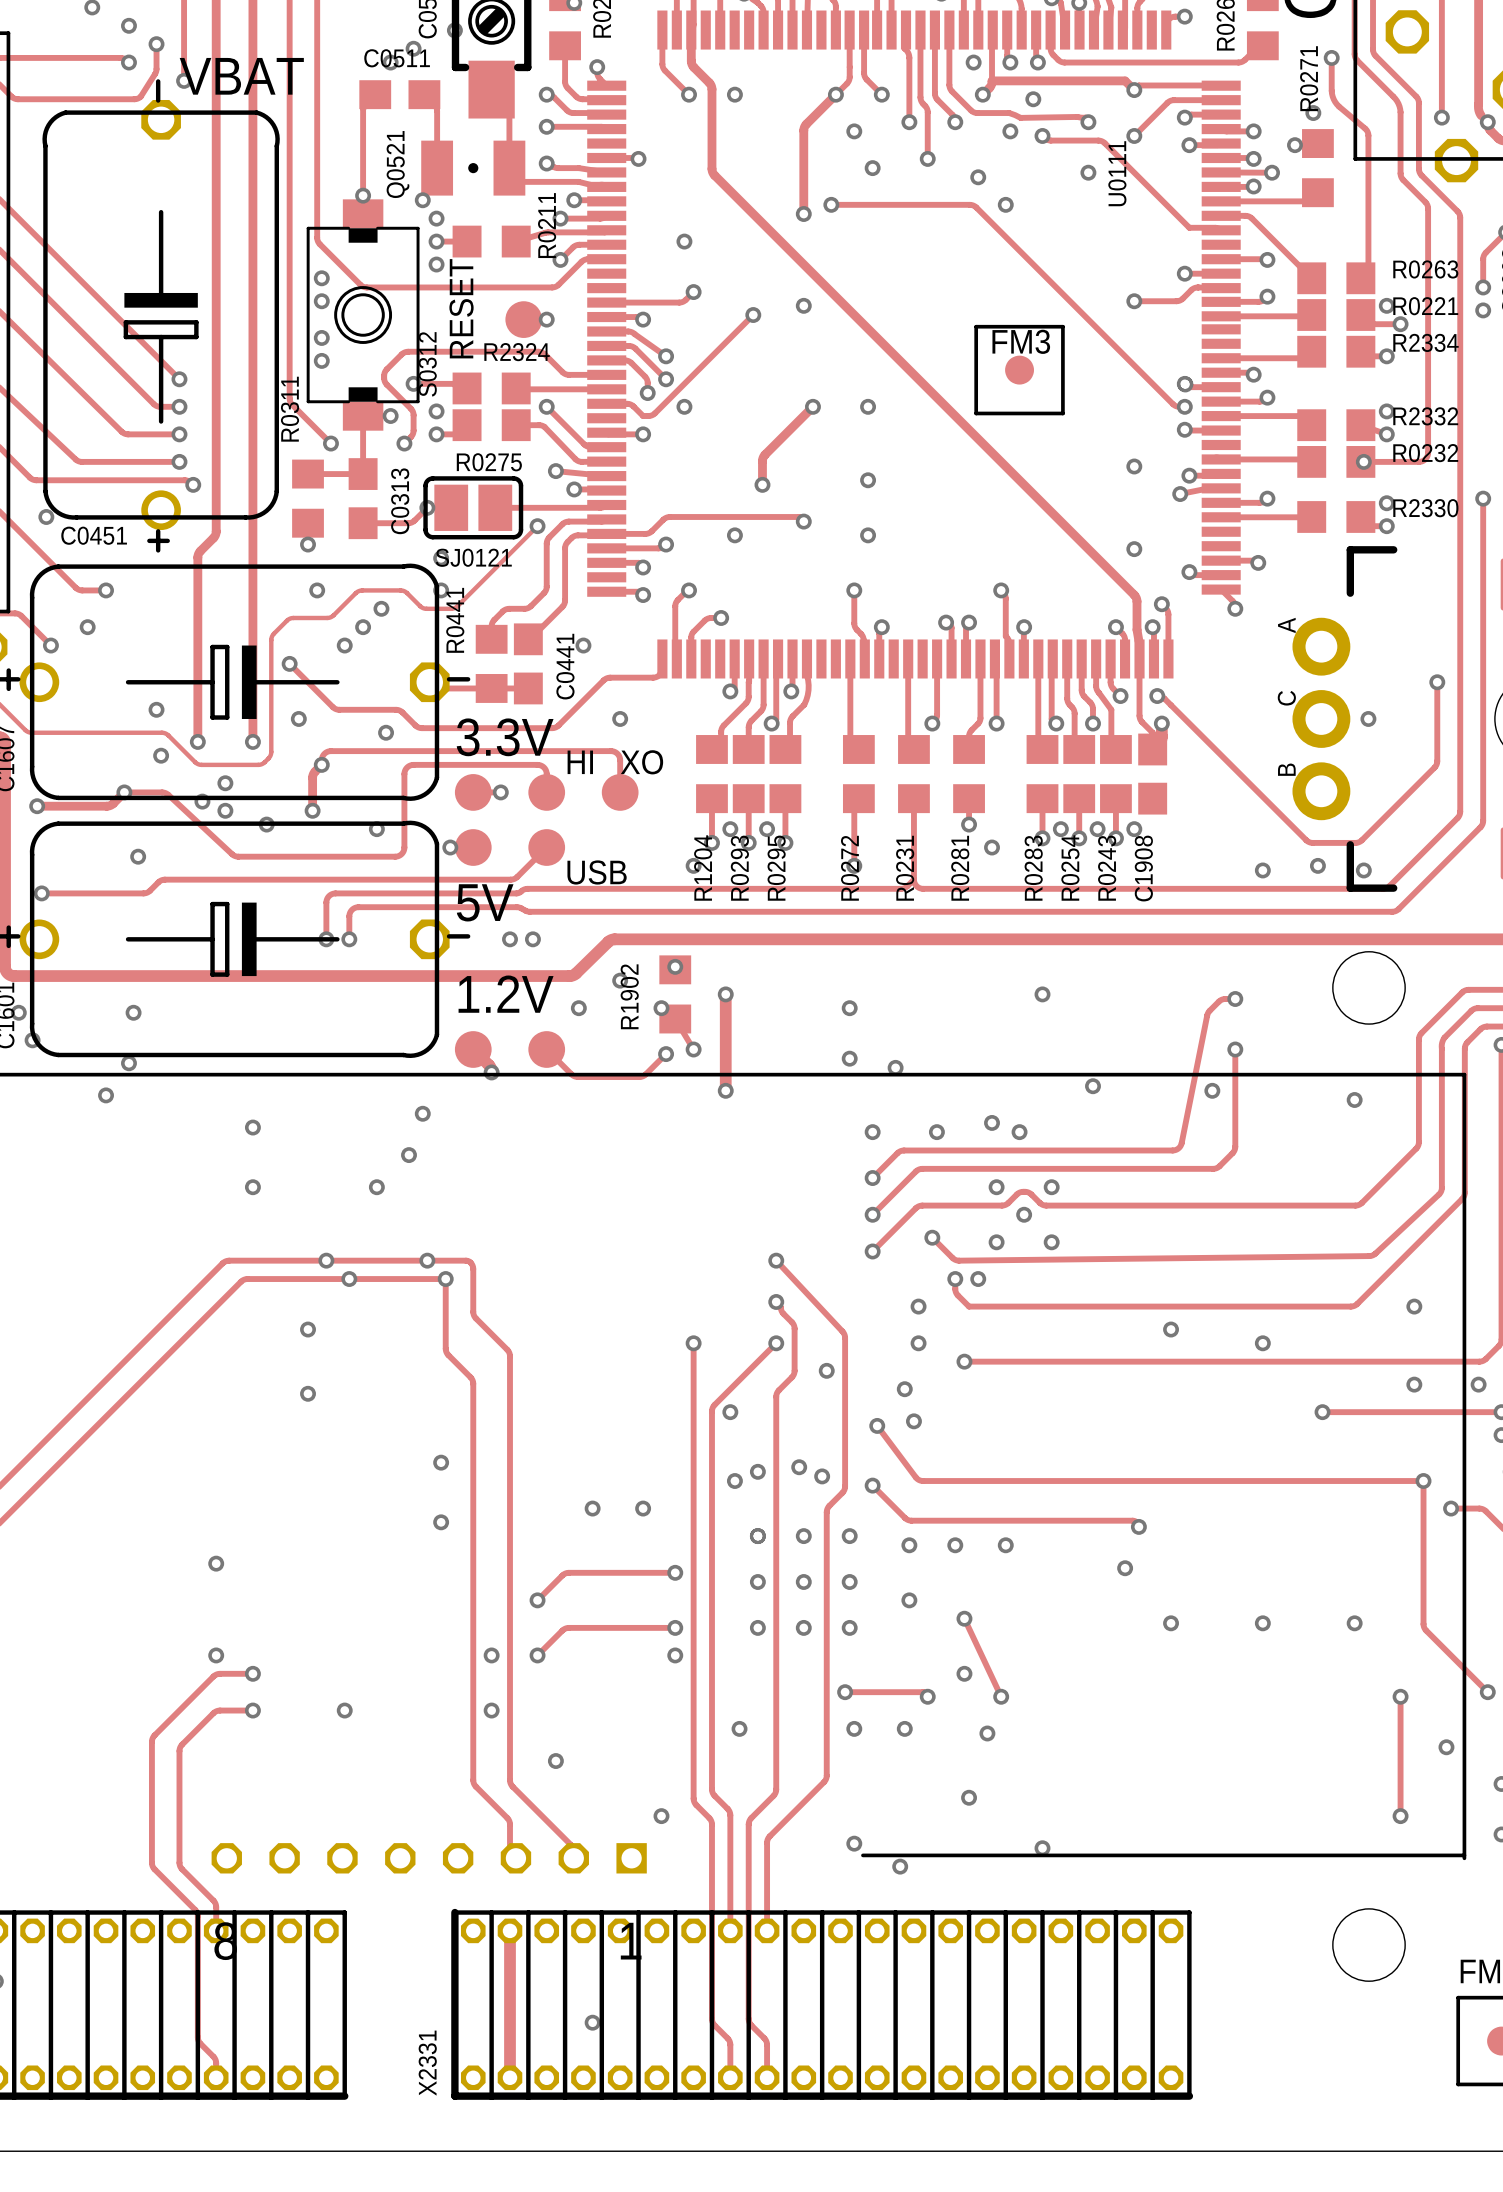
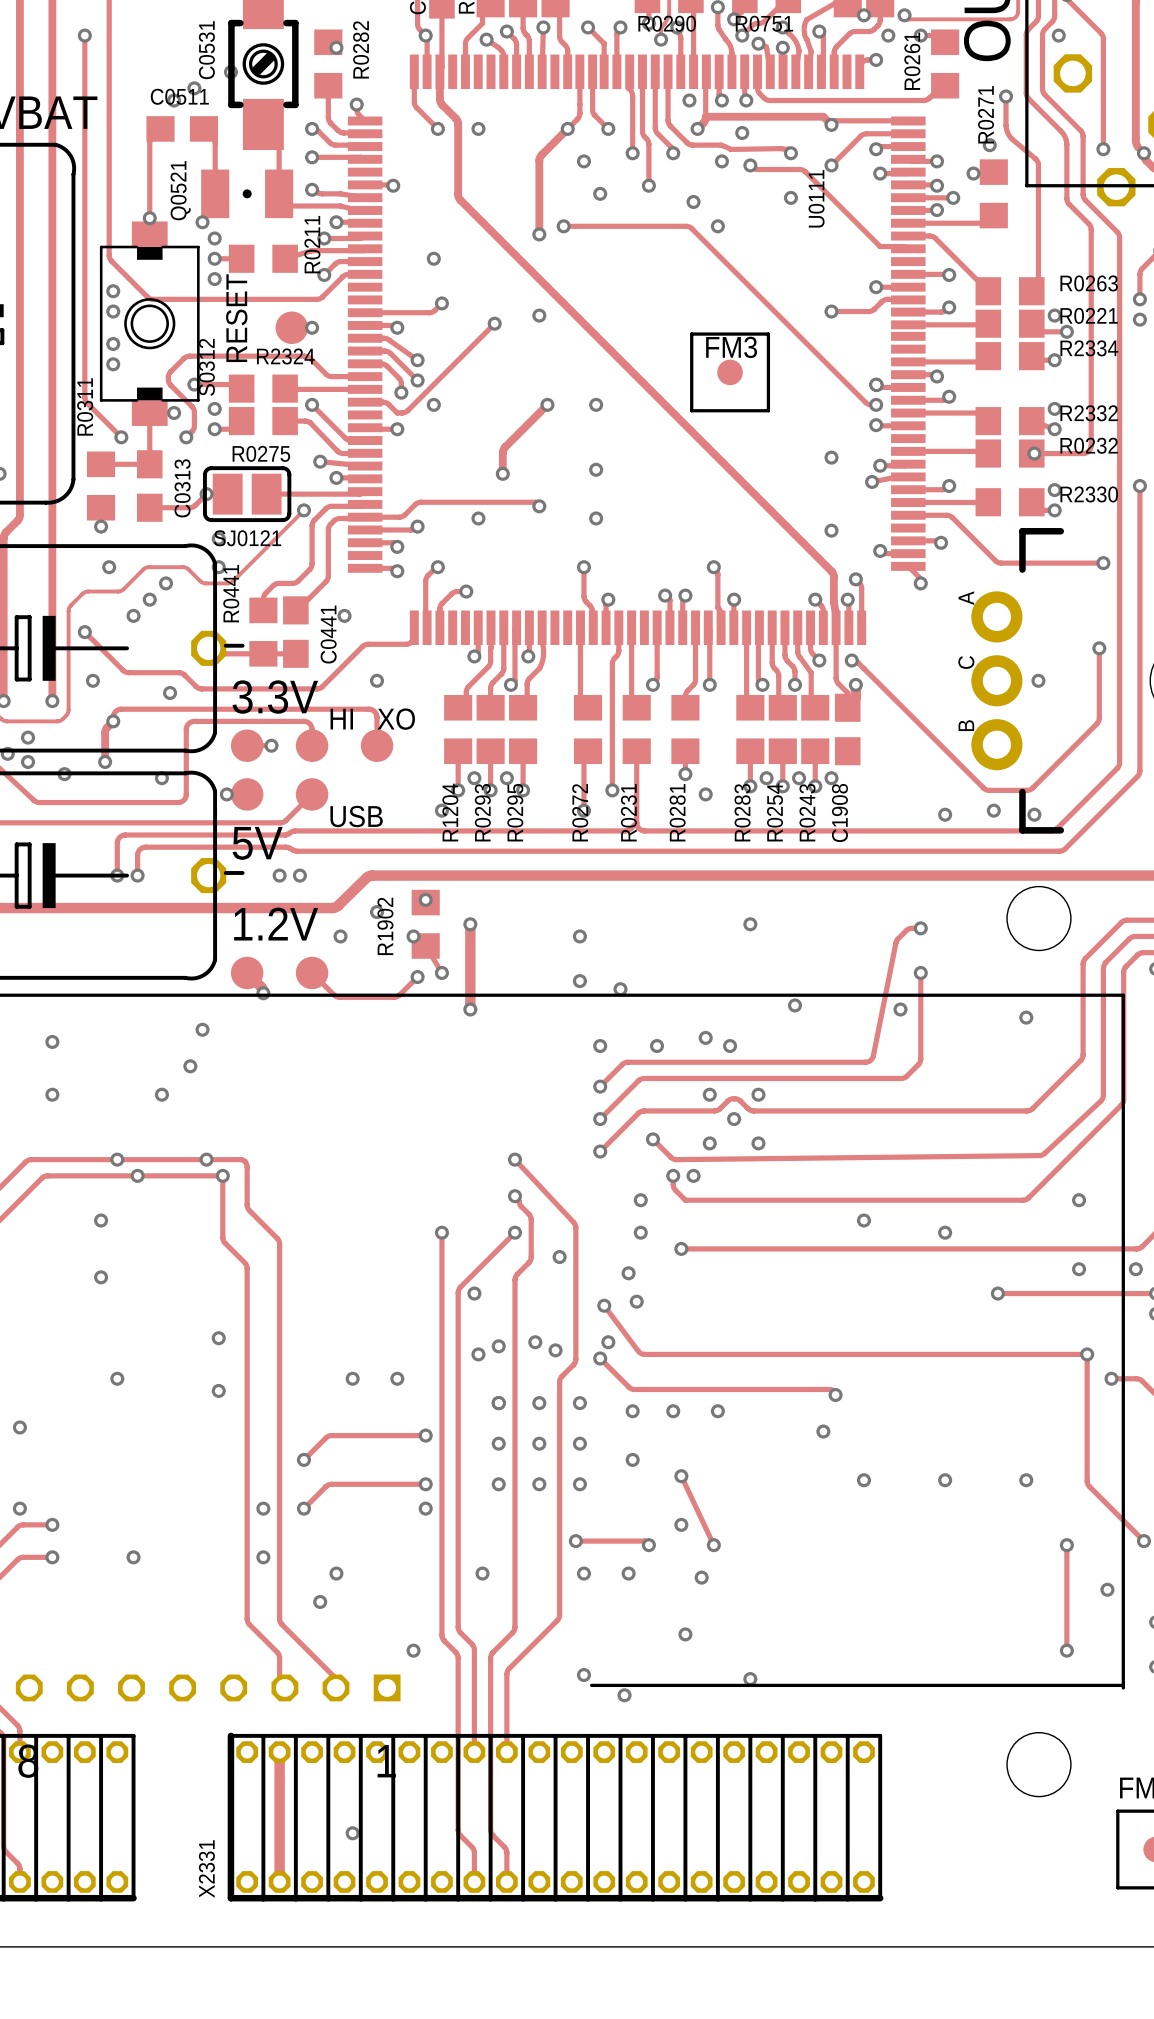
track: none -> (908, 515) (950, 516) (999, 562) (1103, 563)
via: none -> (1103, 563)
track: none -> (618, 627) (618, 651) (612, 663) (612, 790)
via: none -> (612, 790)
via: none -> (608, 1342)
via: none -> (117, 1378)
via: none -> (336, 1573)

